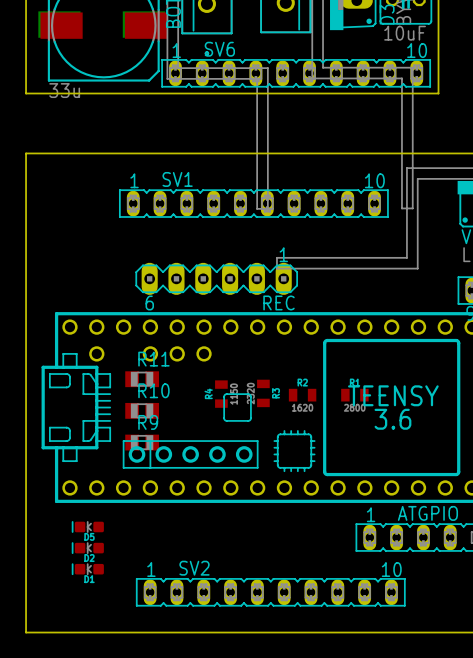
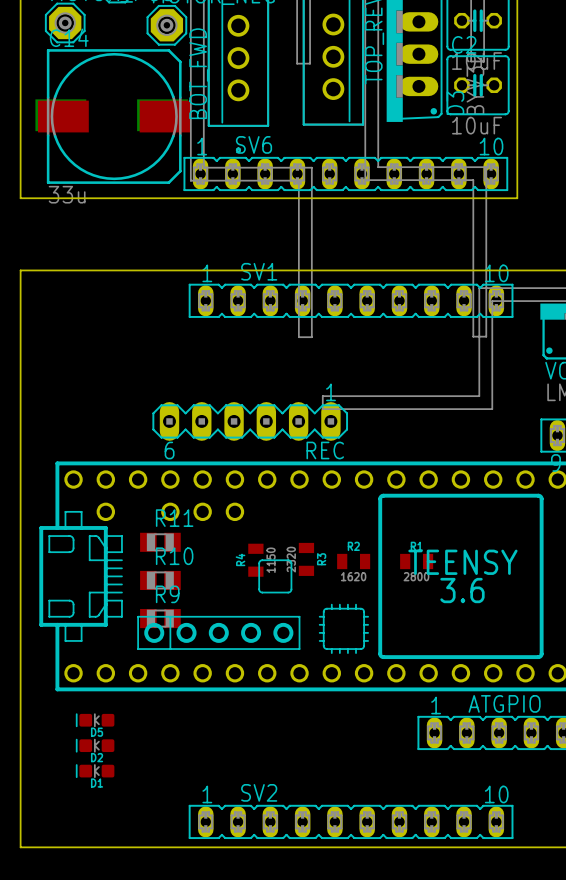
SV1 position: (253, 203) -> (351, 300)
SV2 position: (270, 592) -> (351, 821)

